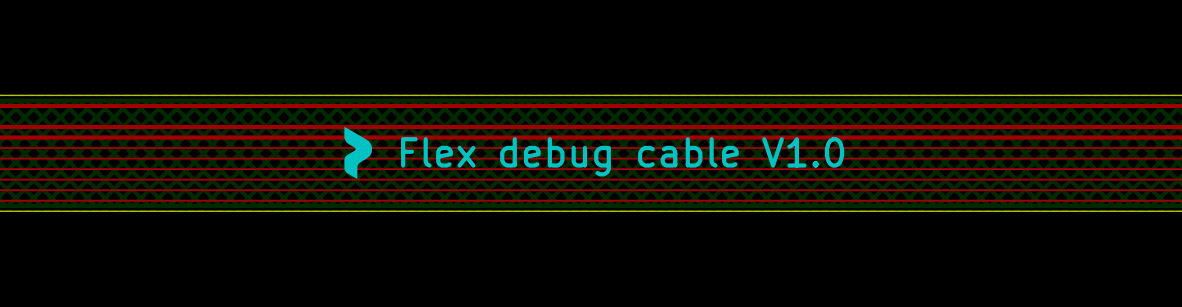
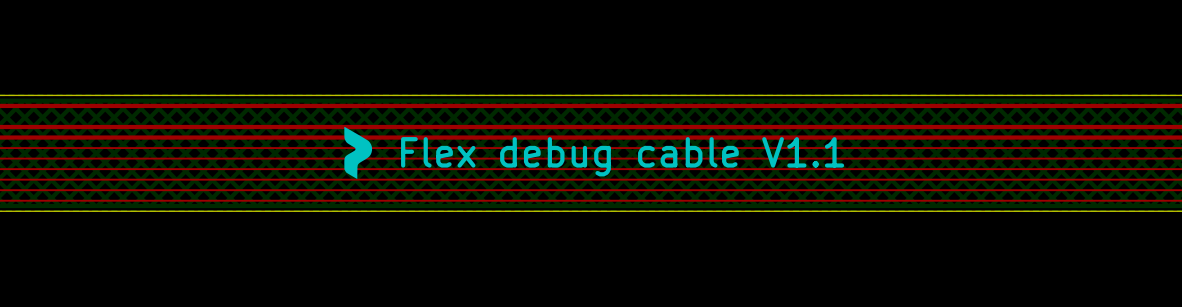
text: Flex debug cable V1.0 (622, 156) -> Flex debug cable V1.1 (622, 156)

